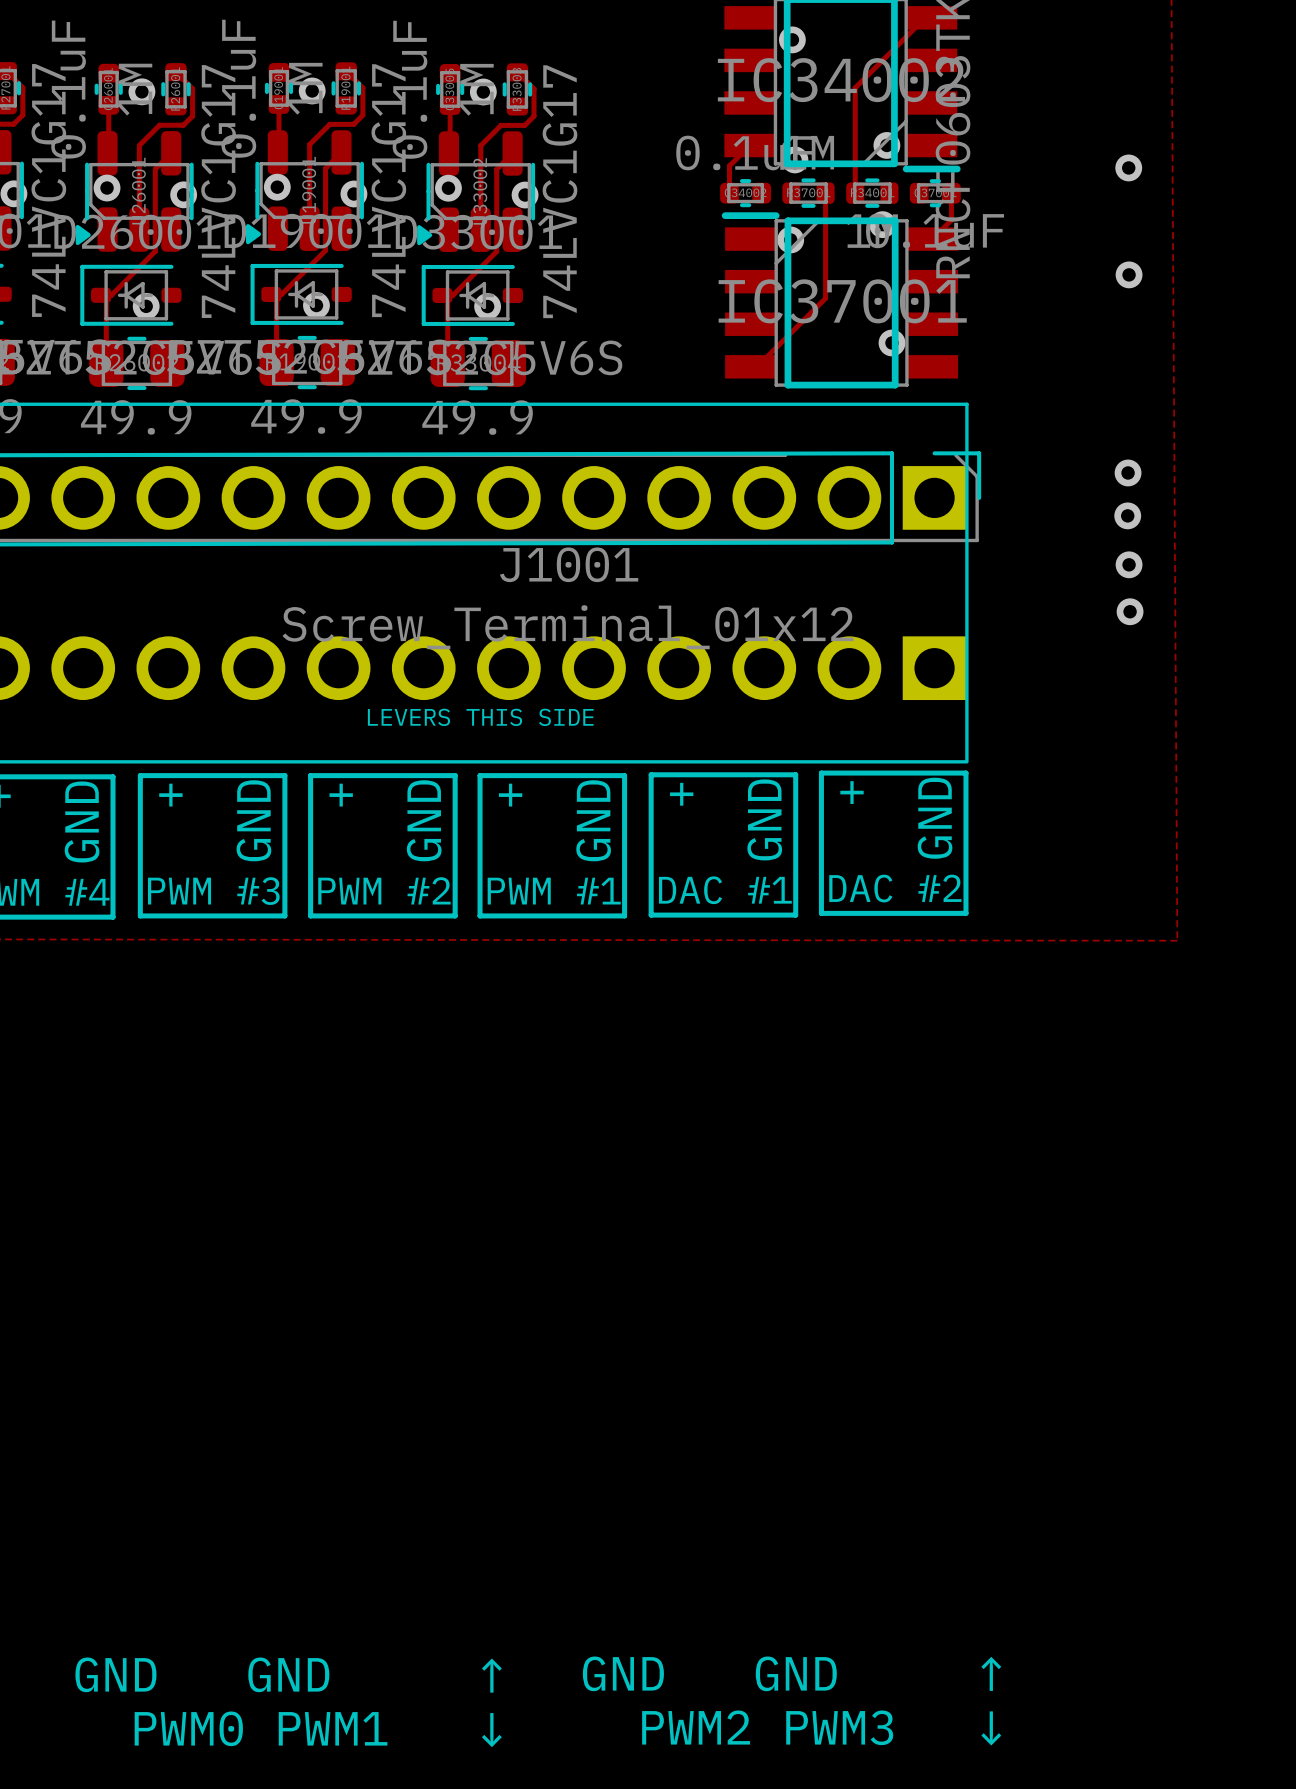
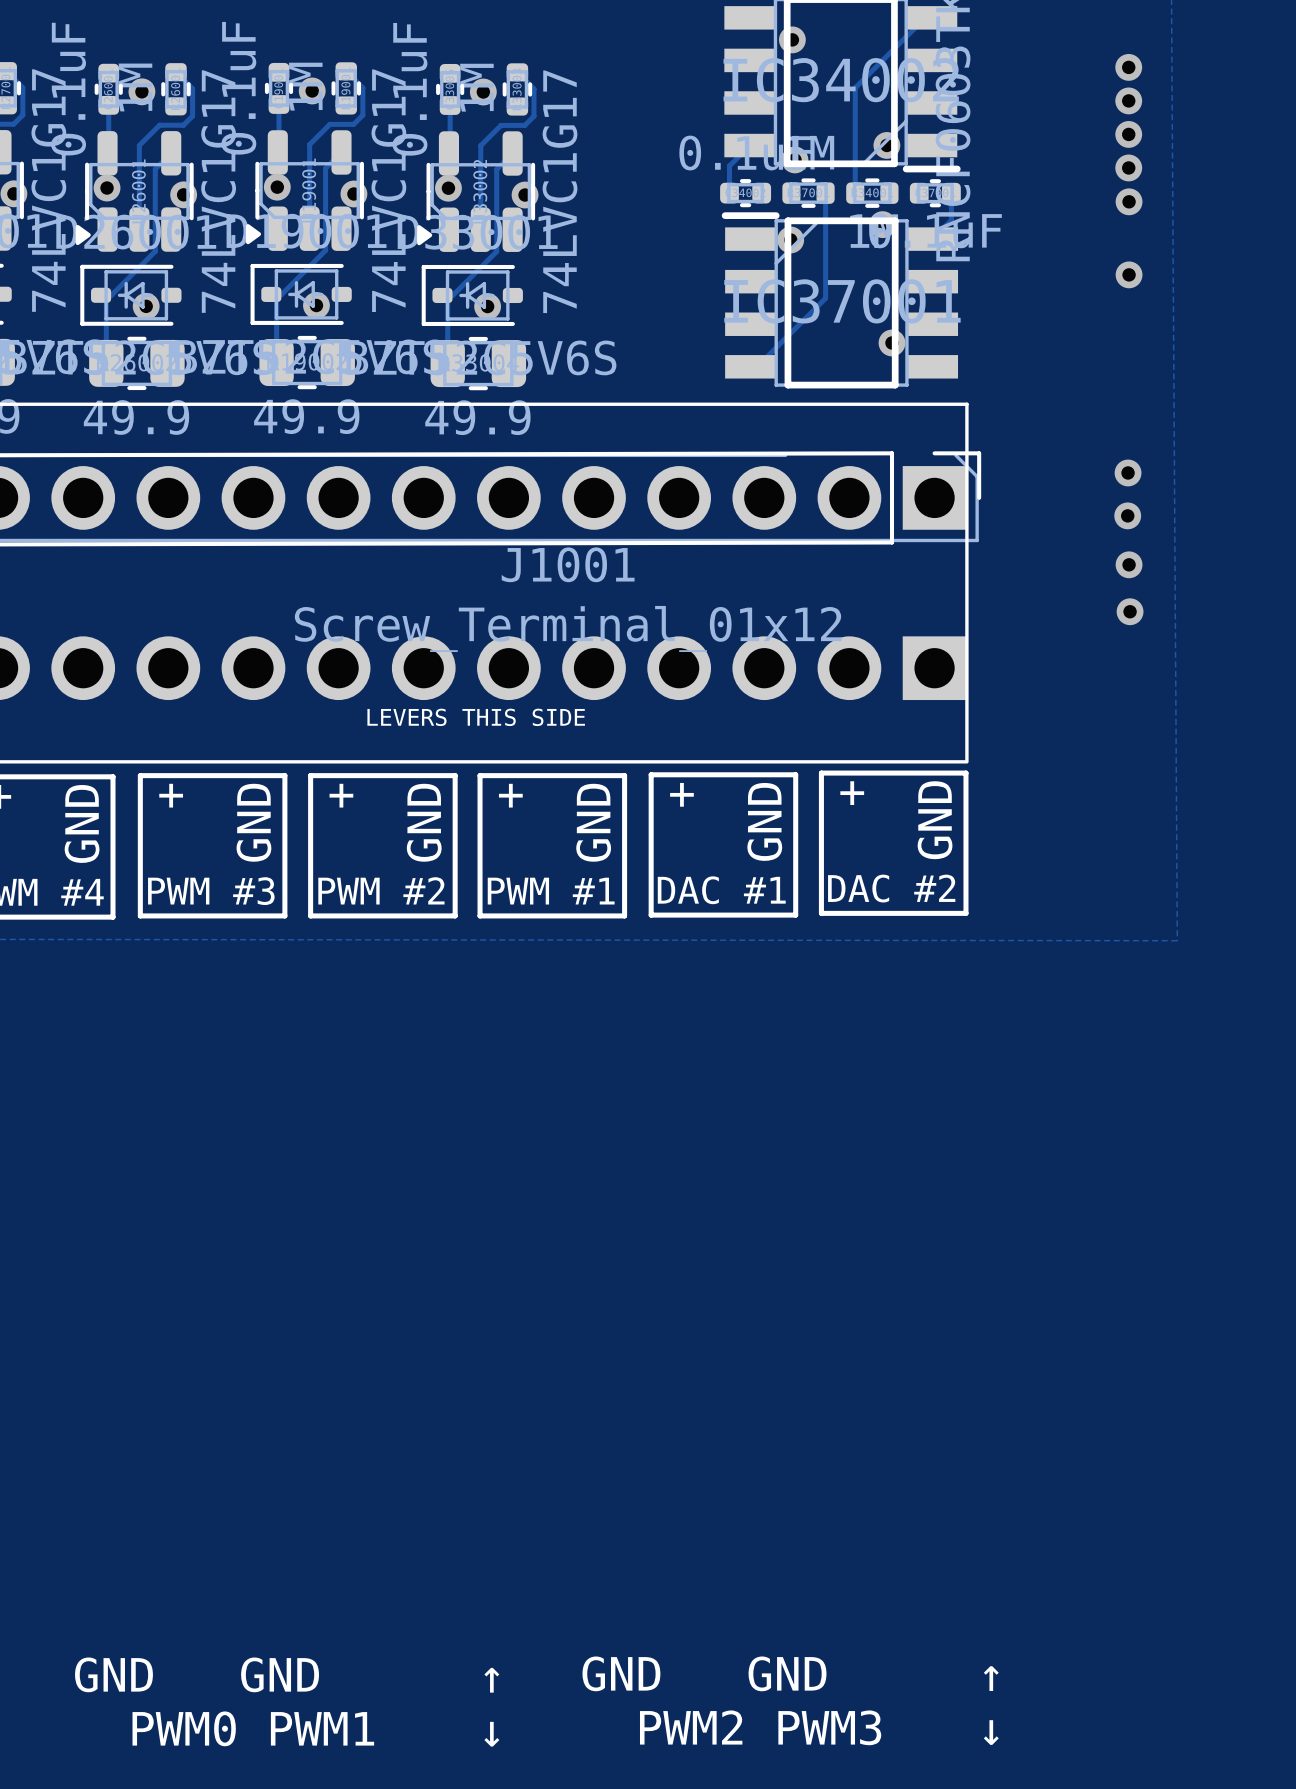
via: none -> (1128, 67)
via: none -> (1128, 100)
via: none -> (1128, 134)
via: none -> (1129, 201)

